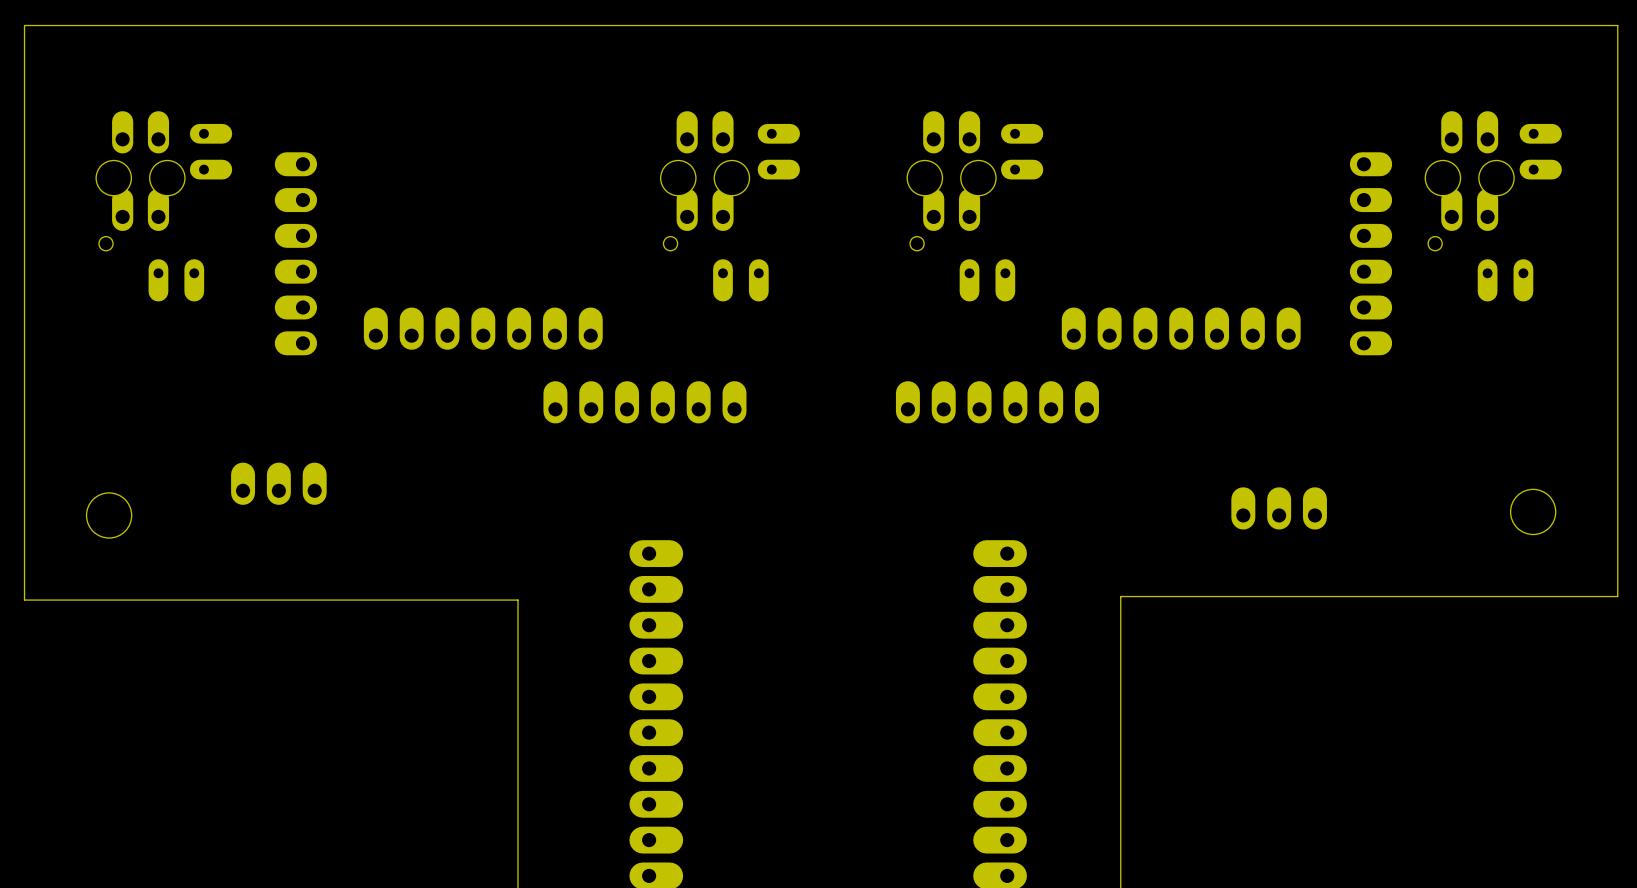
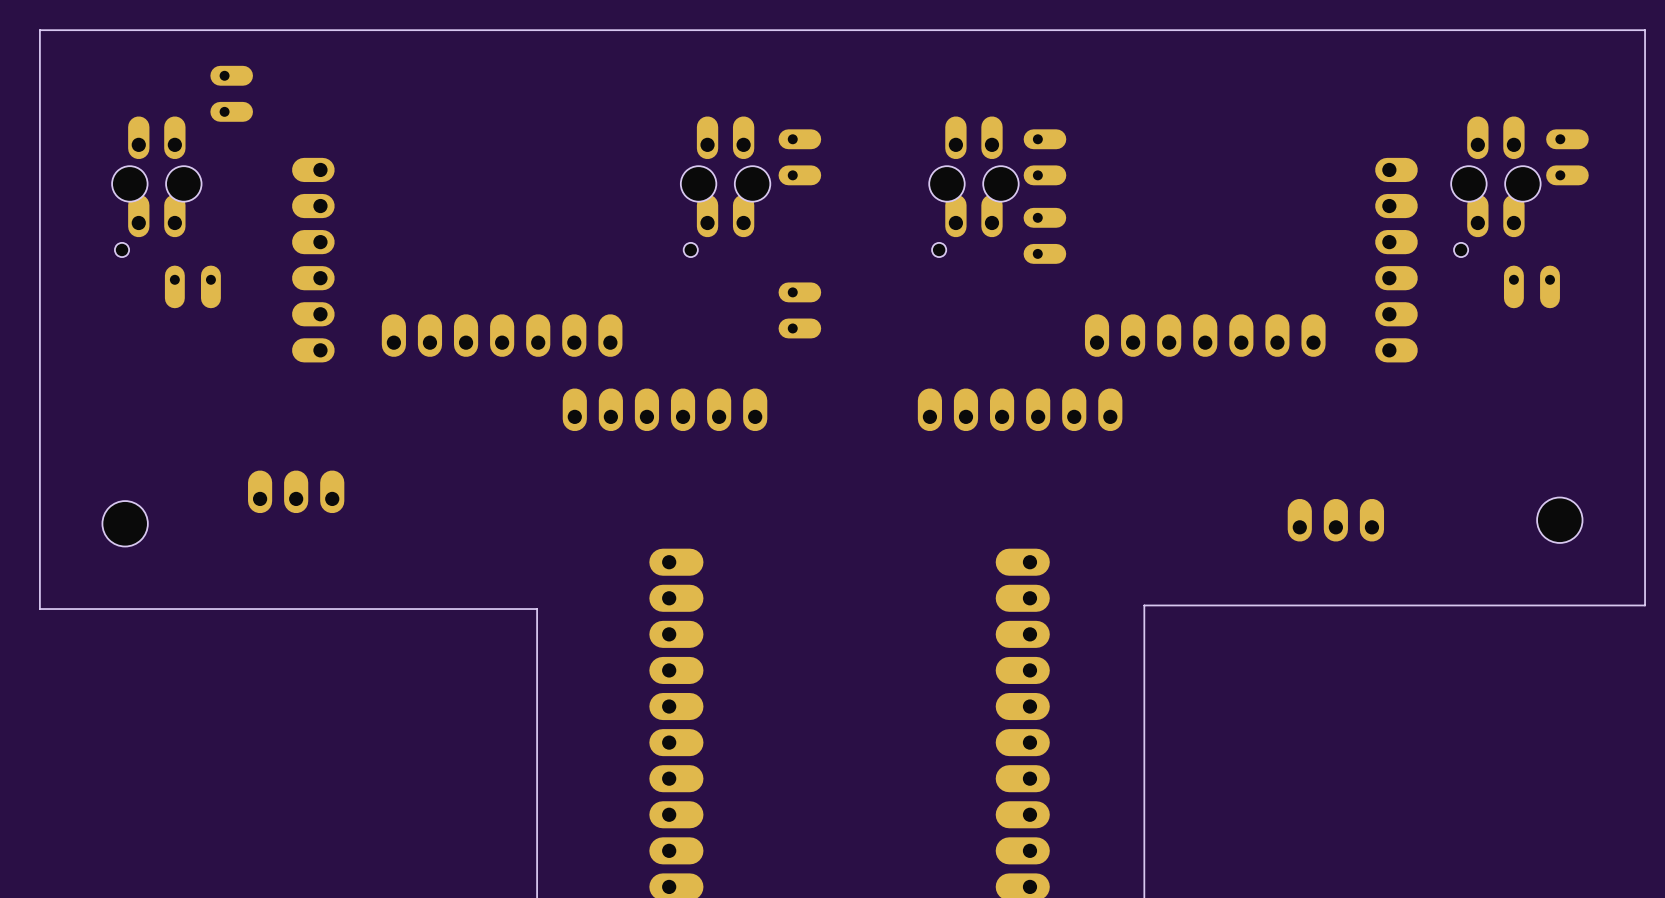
part position: (211, 151) -> (231, 93)
part rotation: 0° (740, 280) -> 90° counterclockwise (799, 310)
part position: (740, 280) -> (799, 310)
part rotation: 0° (987, 280) -> 90° counterclockwise (1044, 235)
part position: (987, 280) -> (1044, 235)
part position: (1279, 508) -> (1335, 520)

